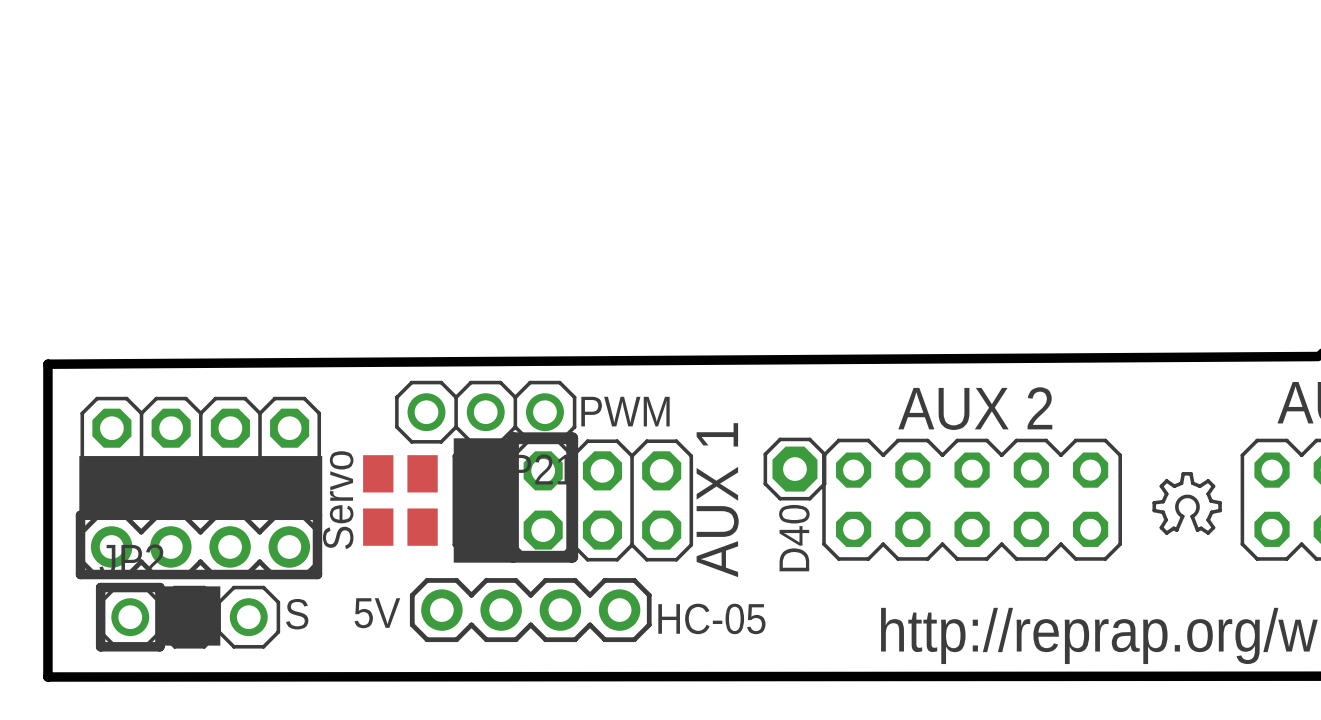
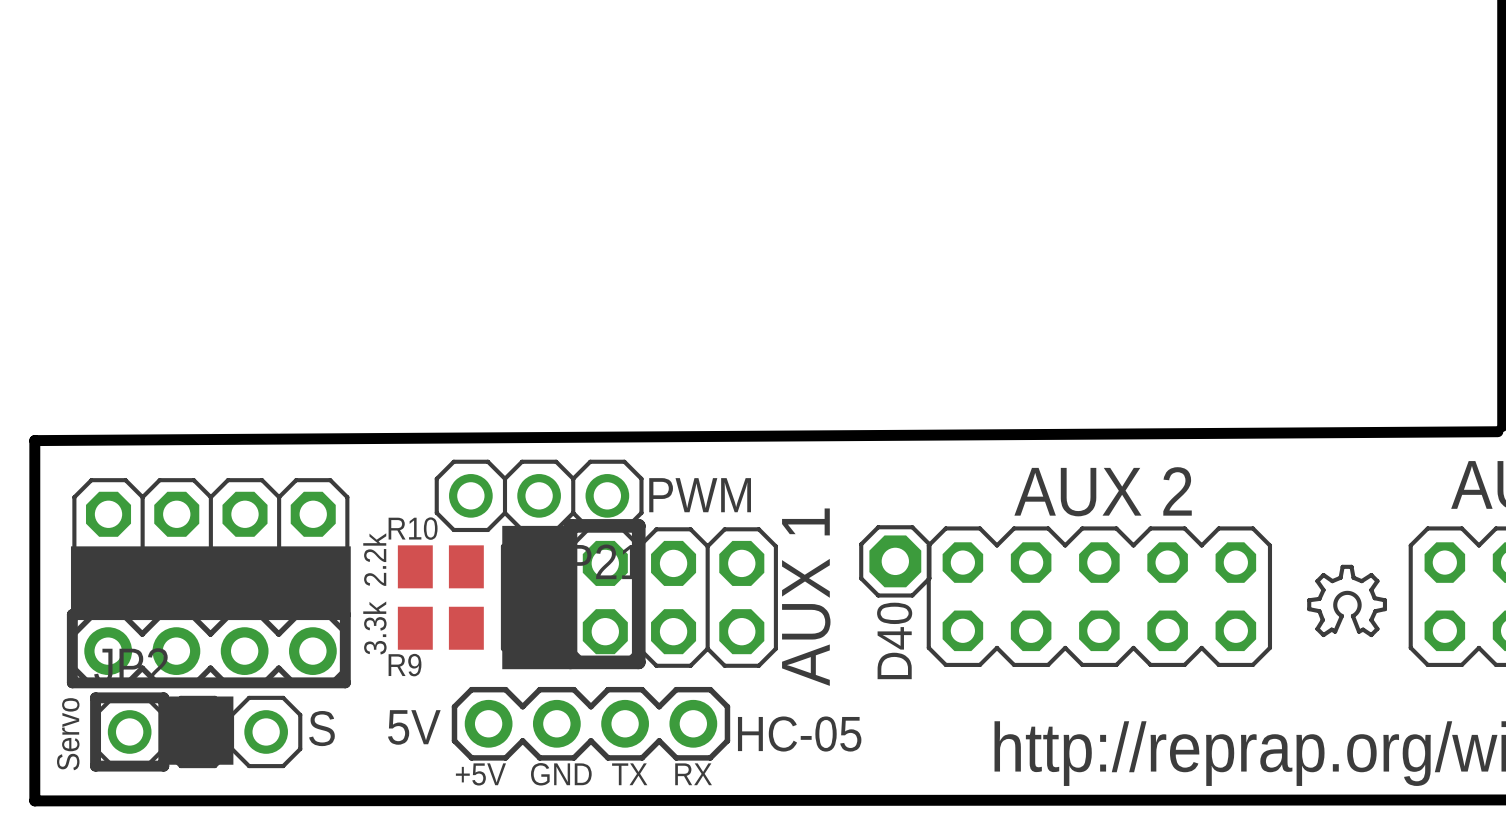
text: none -> R10 (413, 528)
text: none -> 2.2k (374, 559)
text: Servo (338, 500) -> 3.3k (374, 627)
text: none -> R9 (405, 665)
text: none -> Servo (68, 734)
text: none -> GND (561, 774)
text: none -> TX (629, 774)
text: none -> RX (693, 774)
text: none -> +5V (480, 774)

